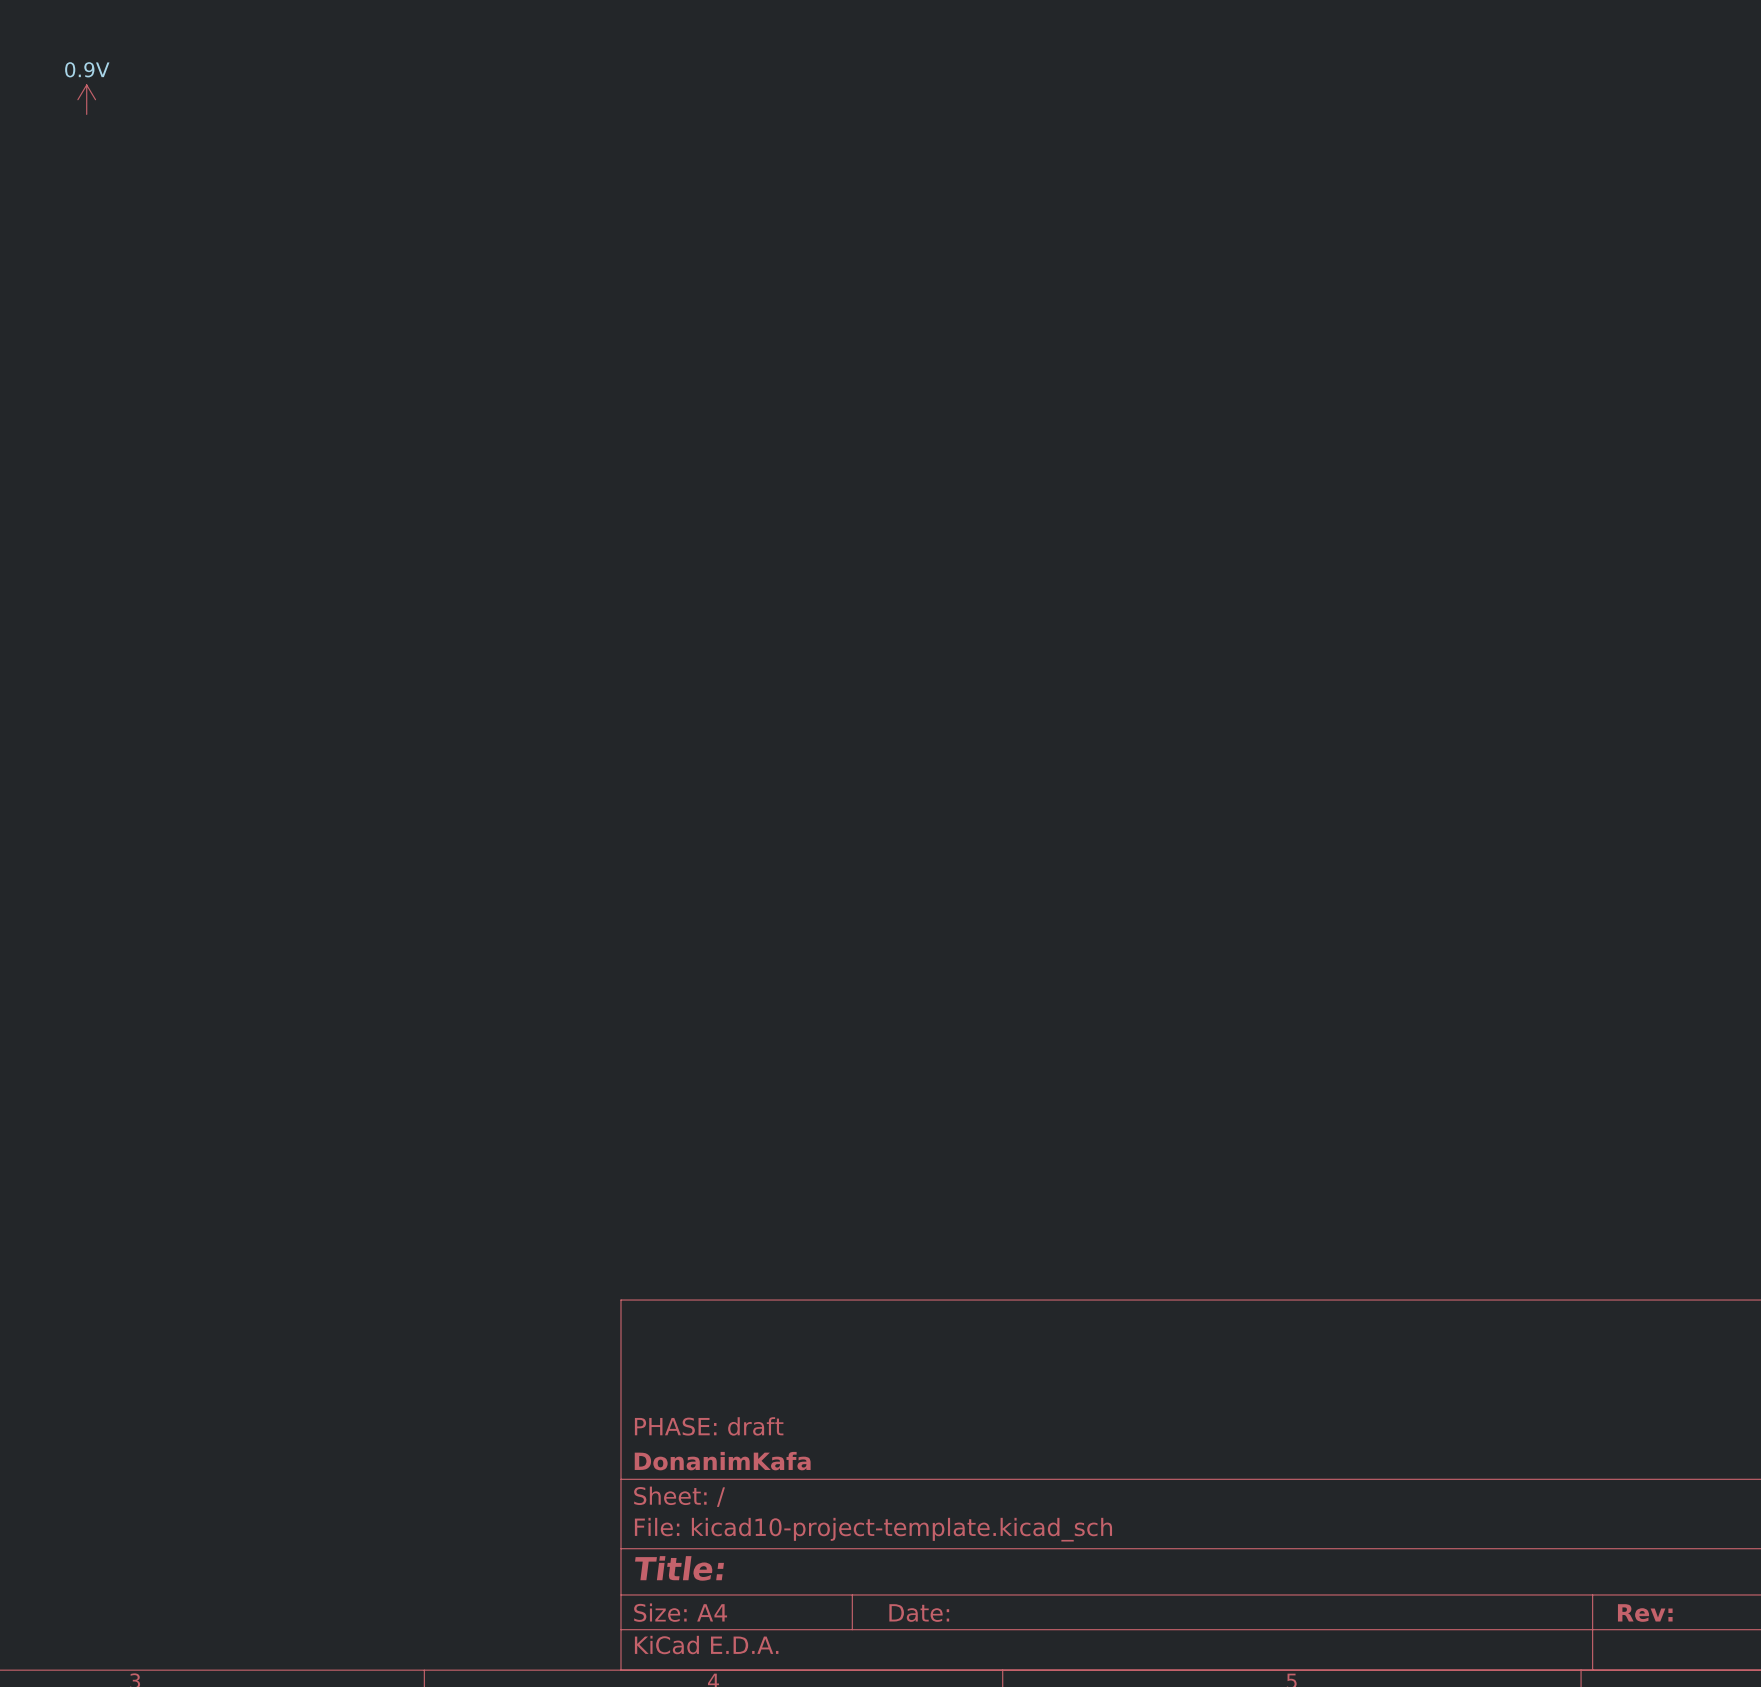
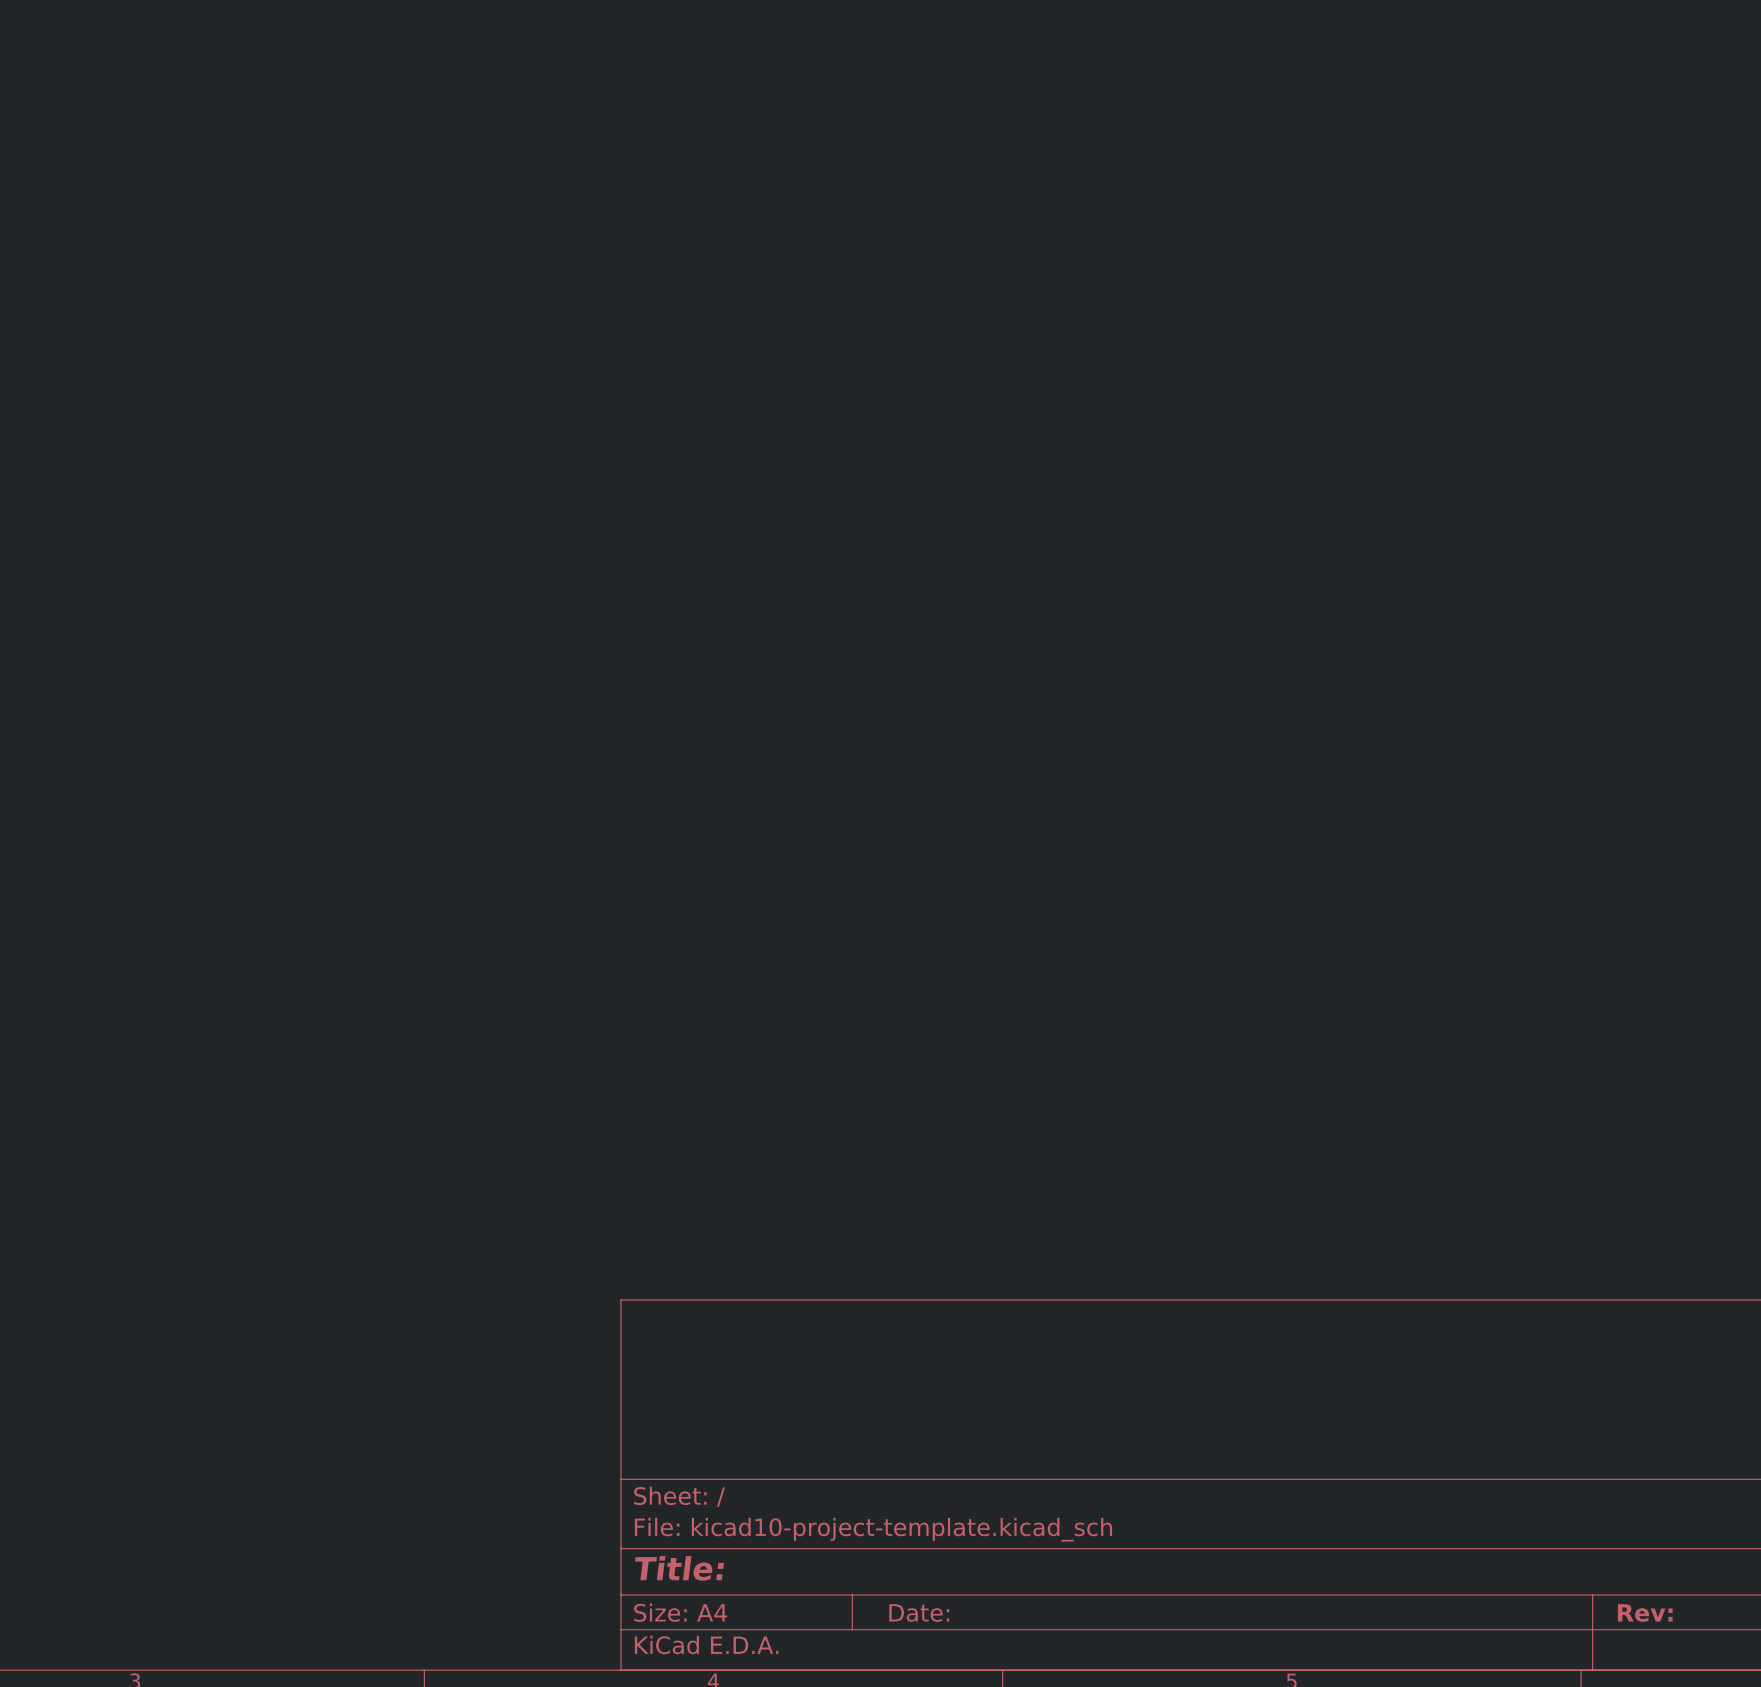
power symbol: 0.9V (86, 99) -> none
title block: PHASE: draft (709, 1426) -> none
title block: DonanimKafa (722, 1461) -> none

